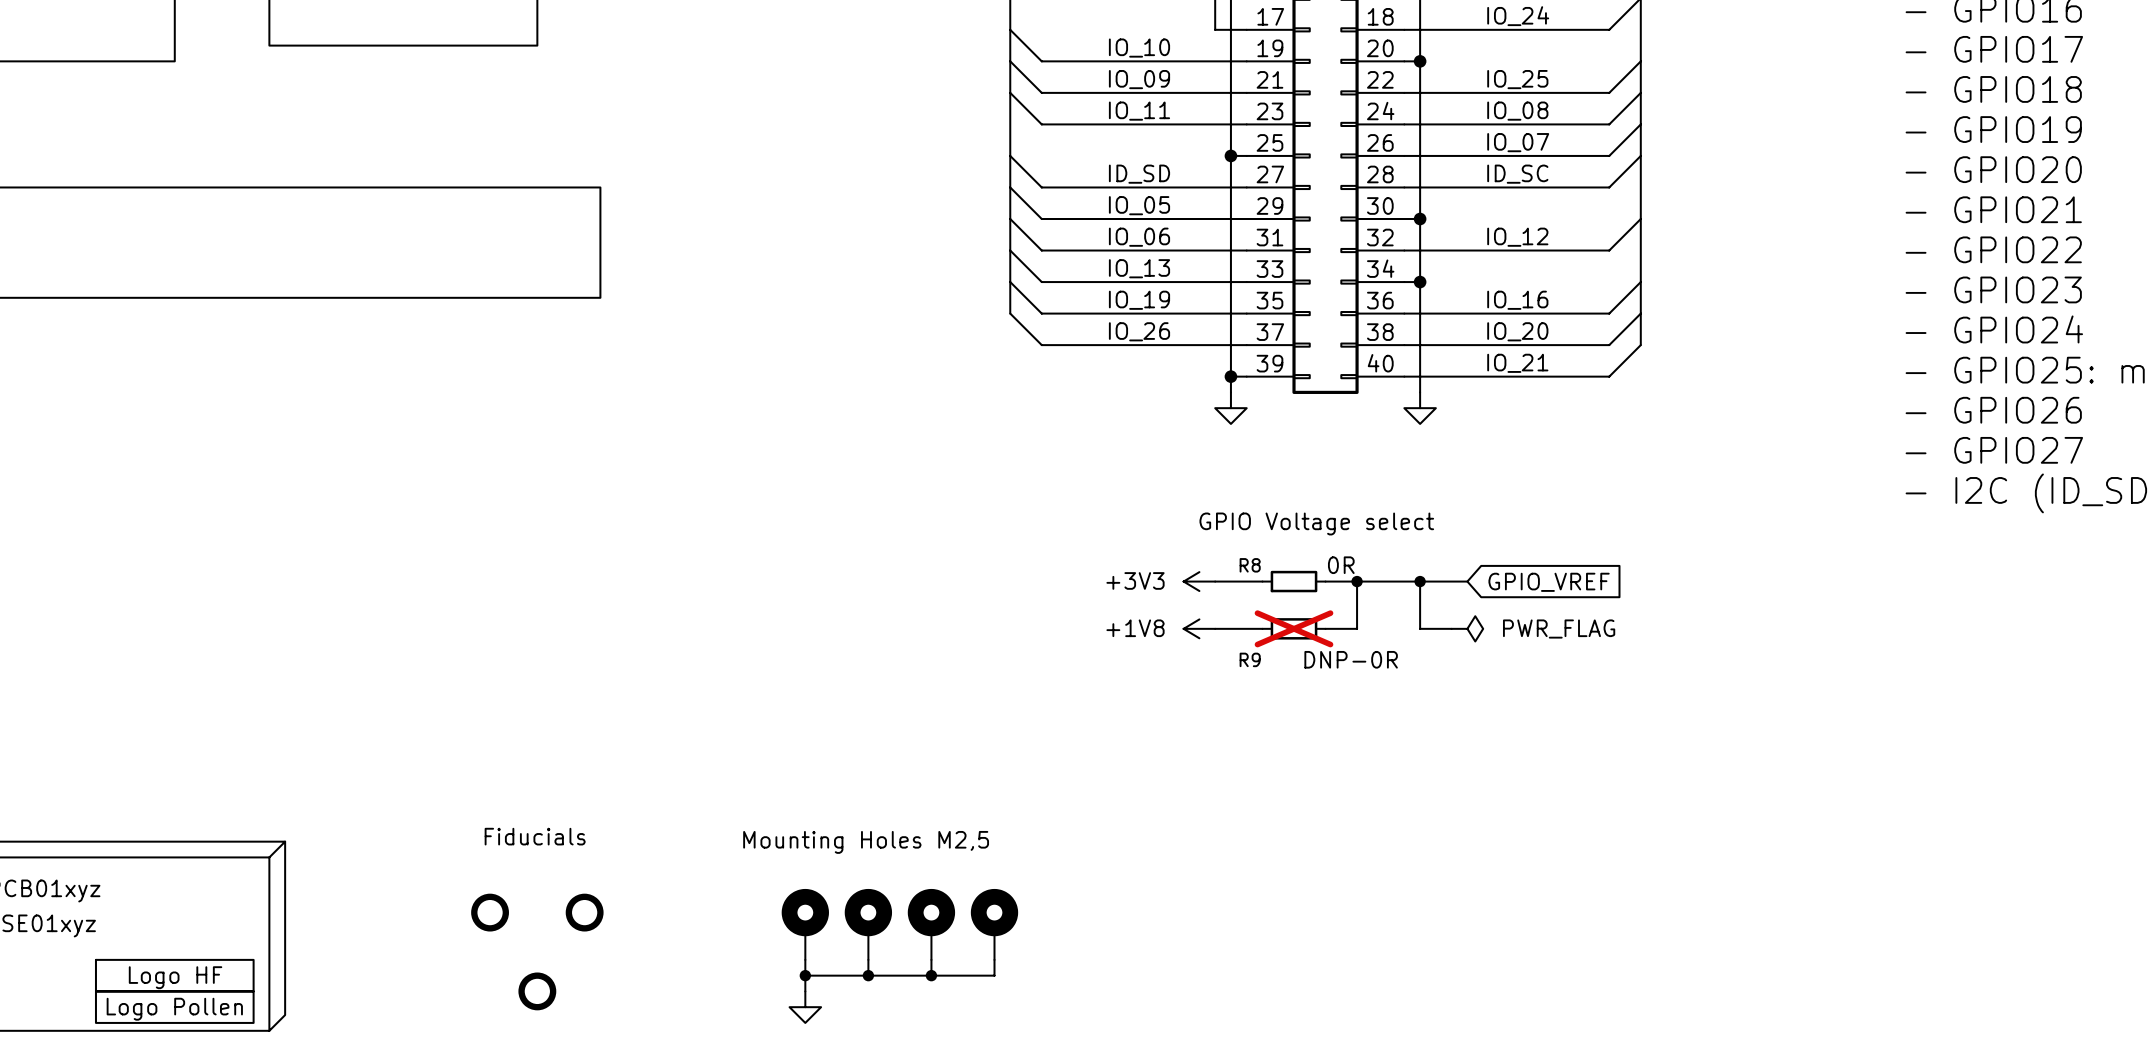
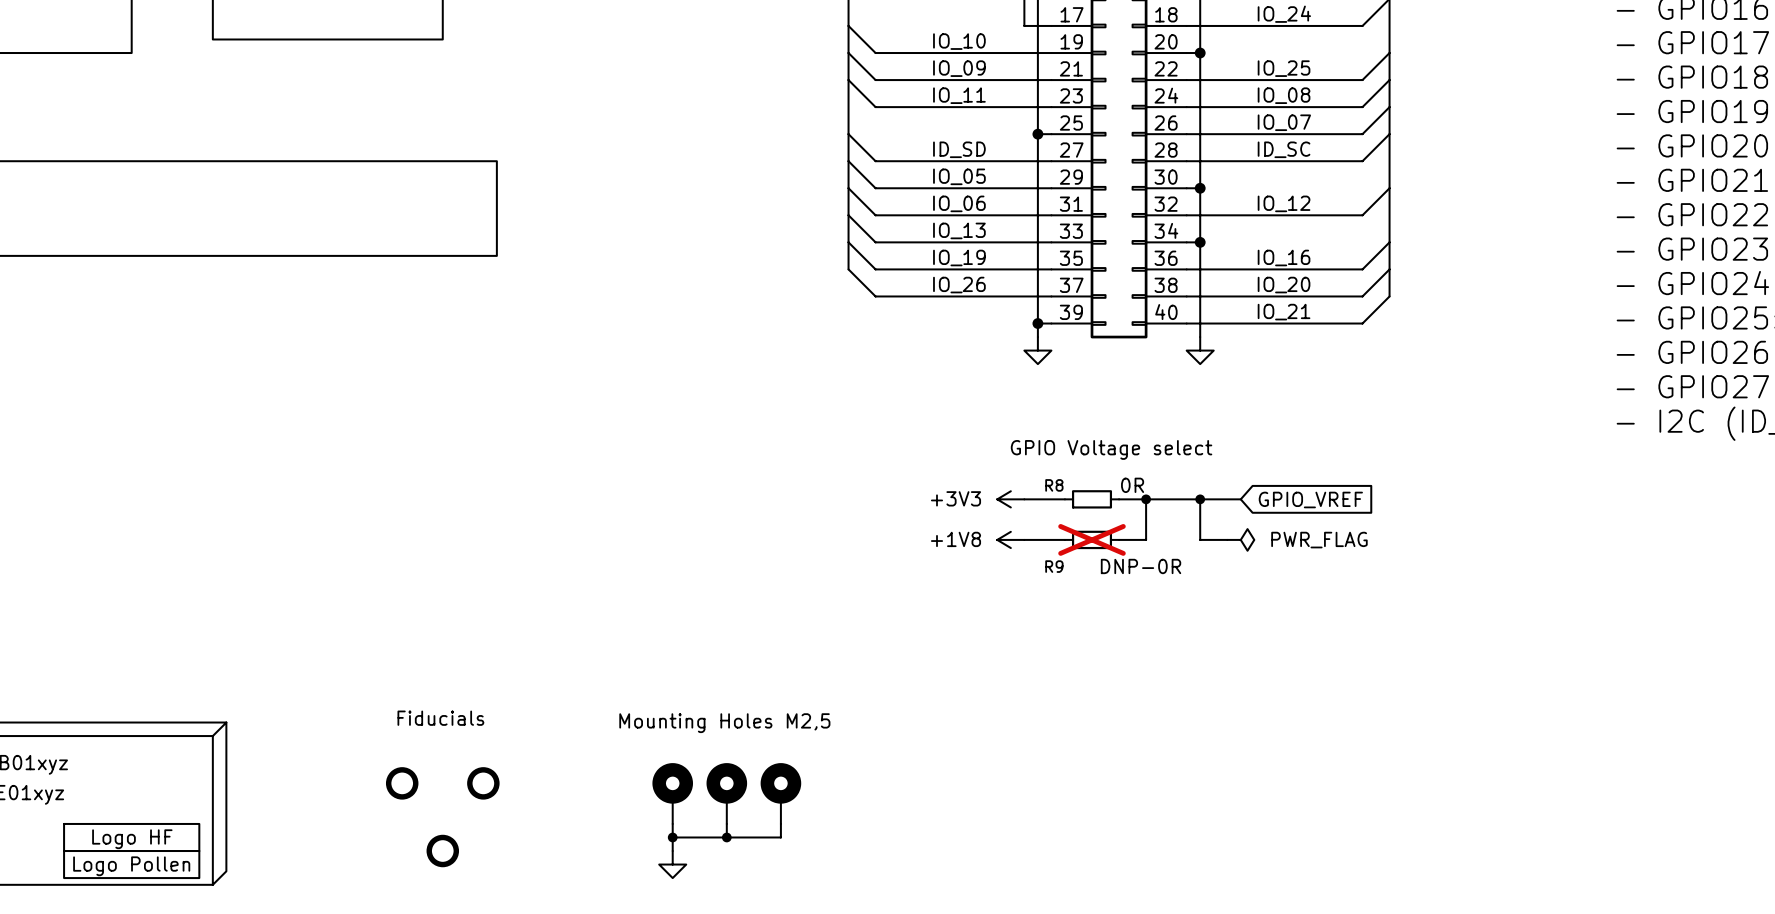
part: (994, 924) -> none
wire: (994, 959) (994, 975) (931, 975) -> none
junction: (931, 975) -> none

